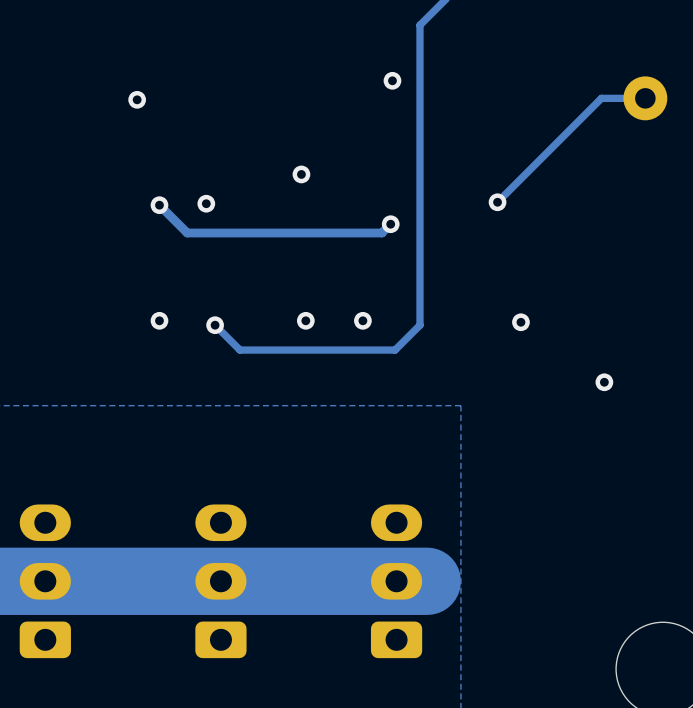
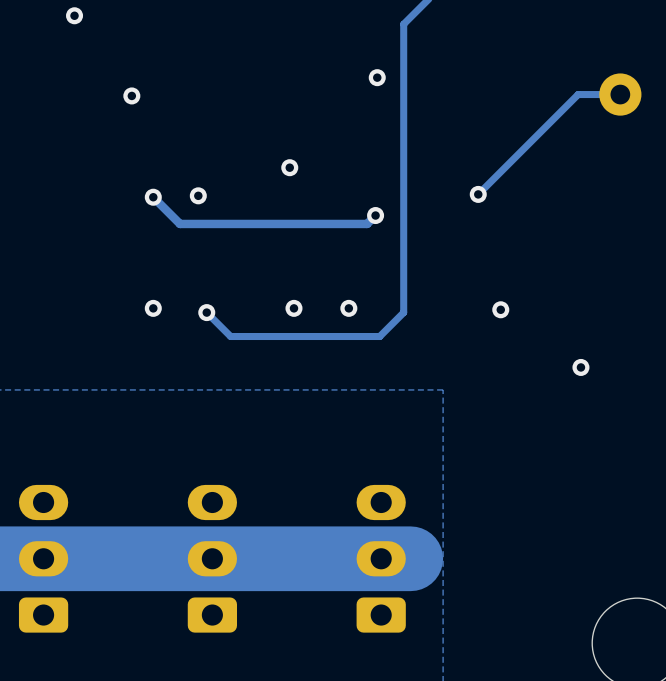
via: none -> (74, 15)

